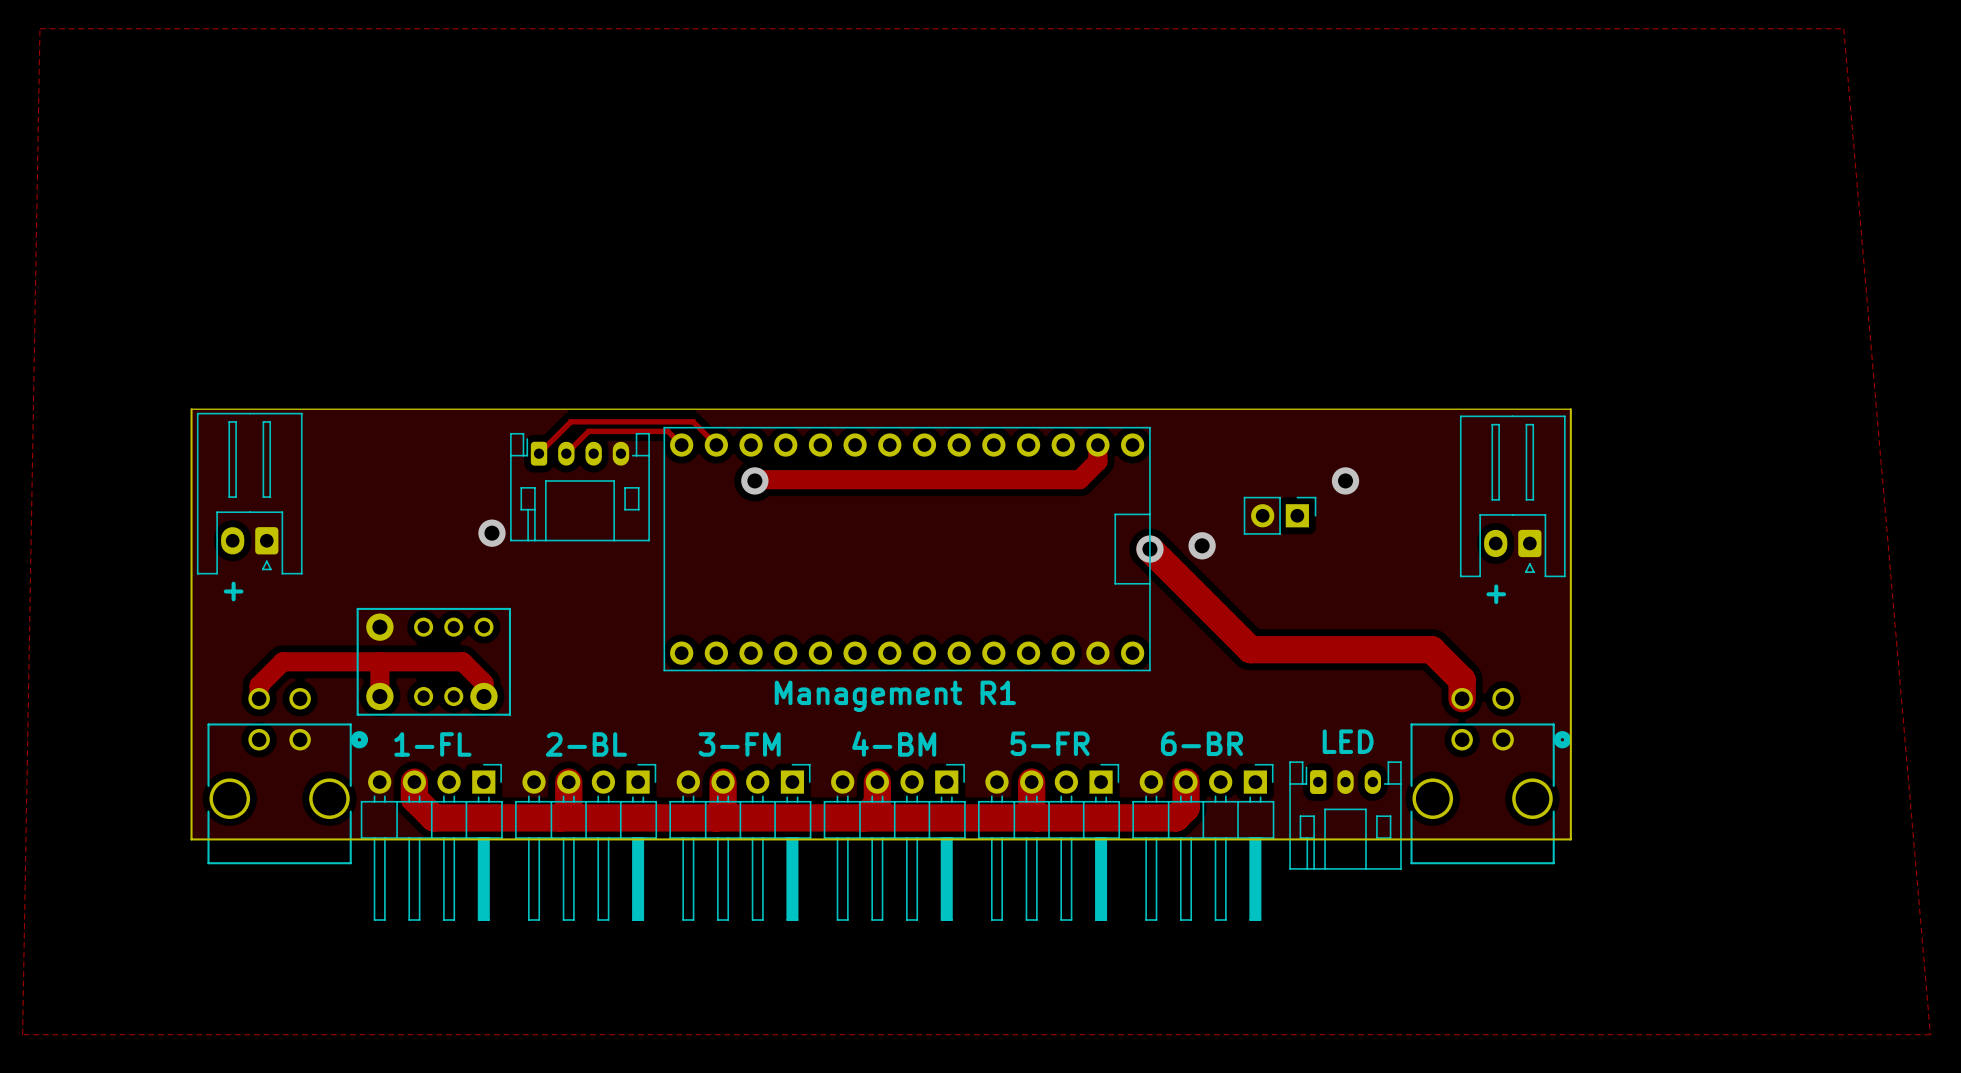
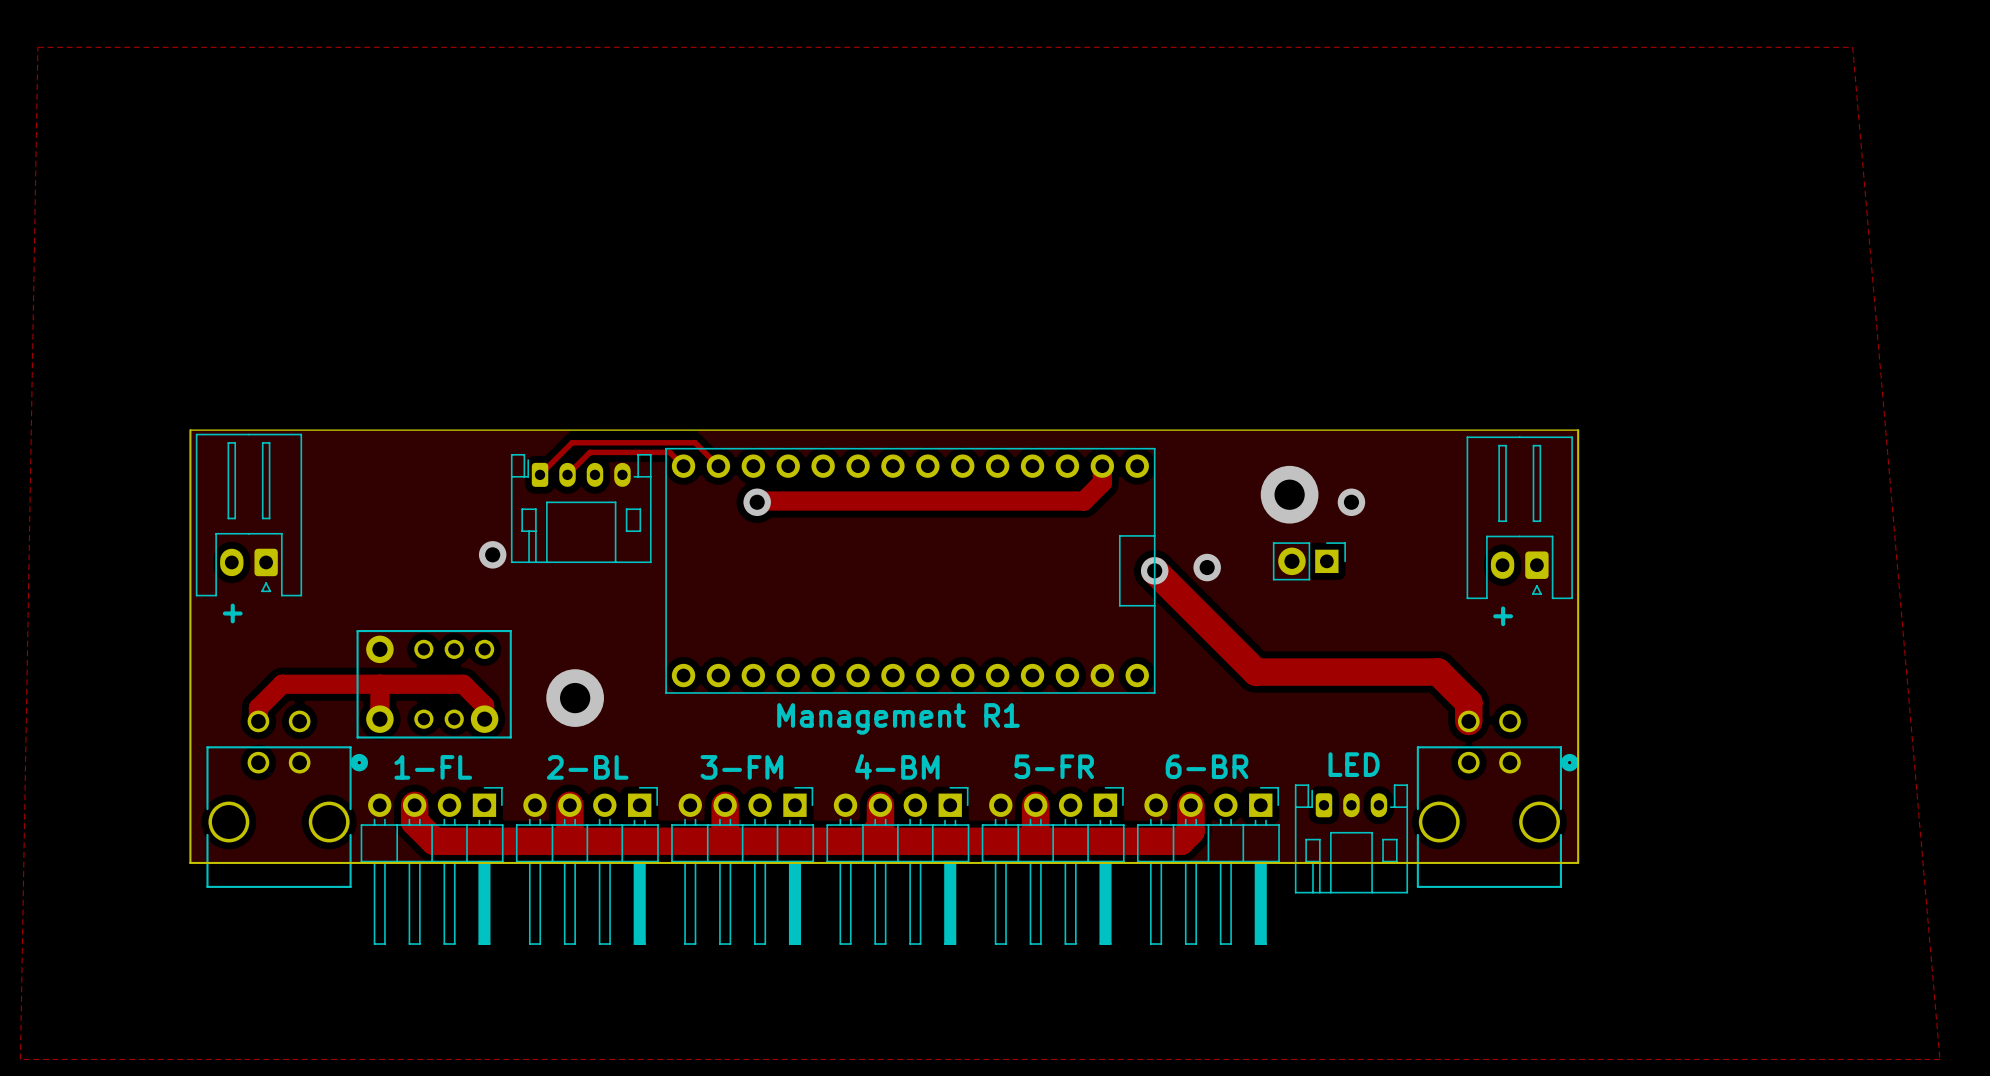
via: none -> (1289, 494)
part: (1280, 515) -> none
part: none -> (1309, 561)
via: none -> (575, 698)

